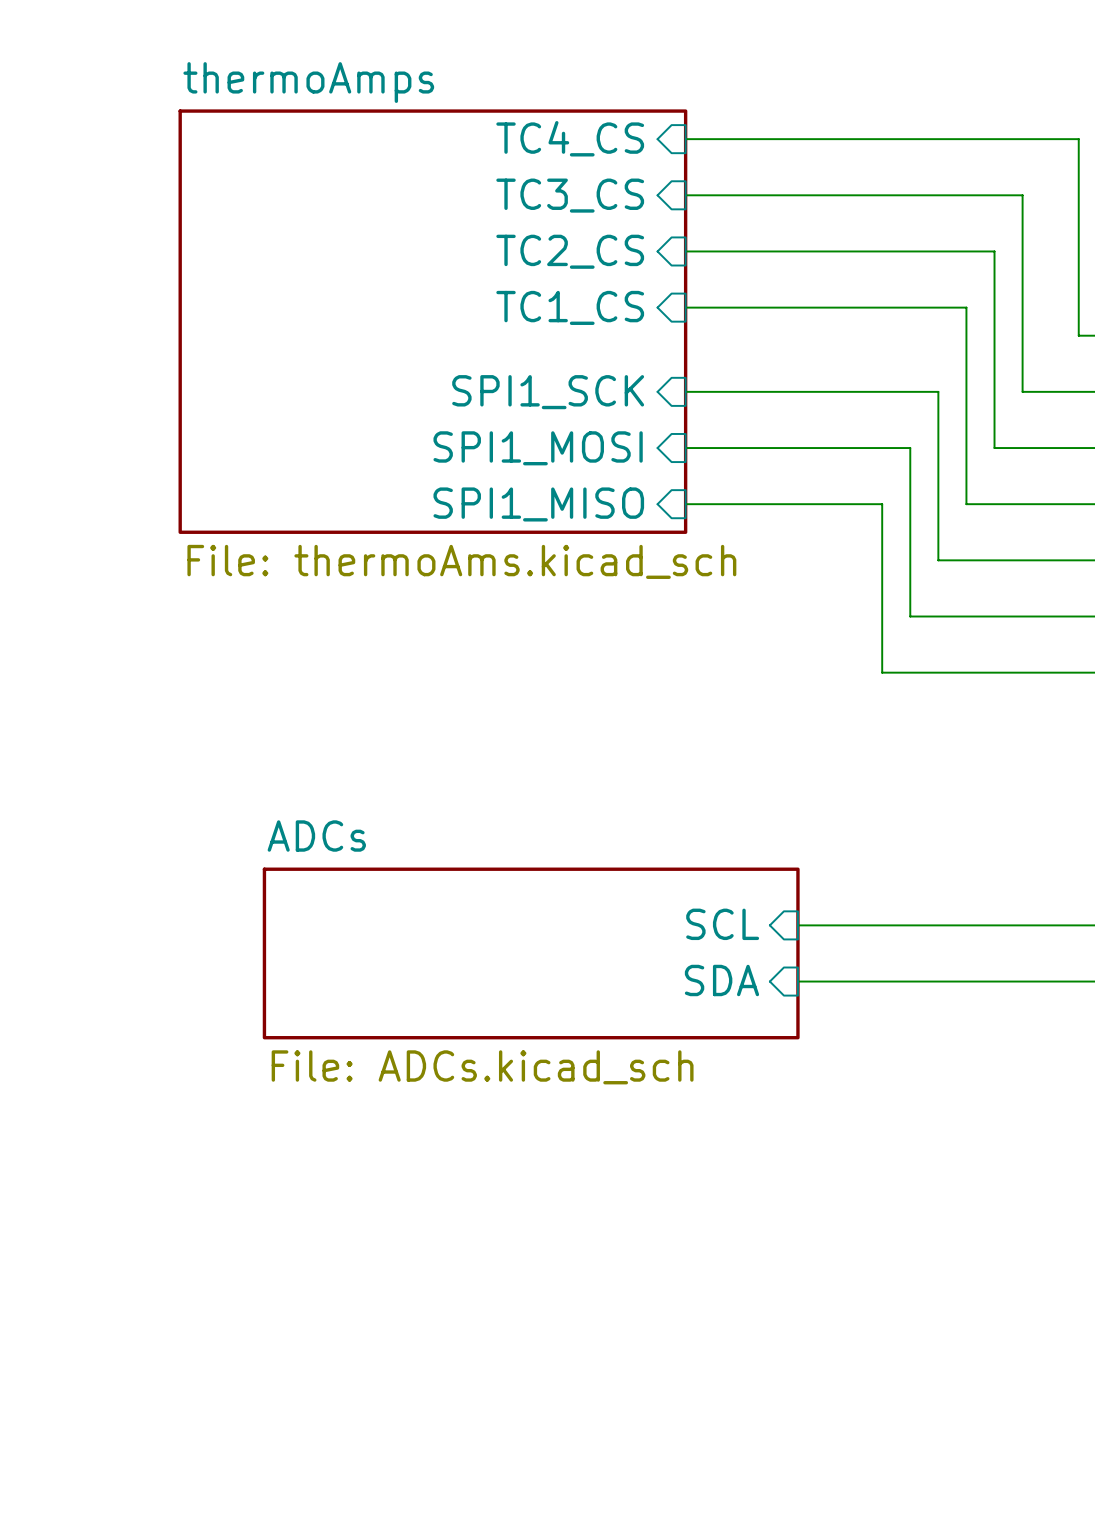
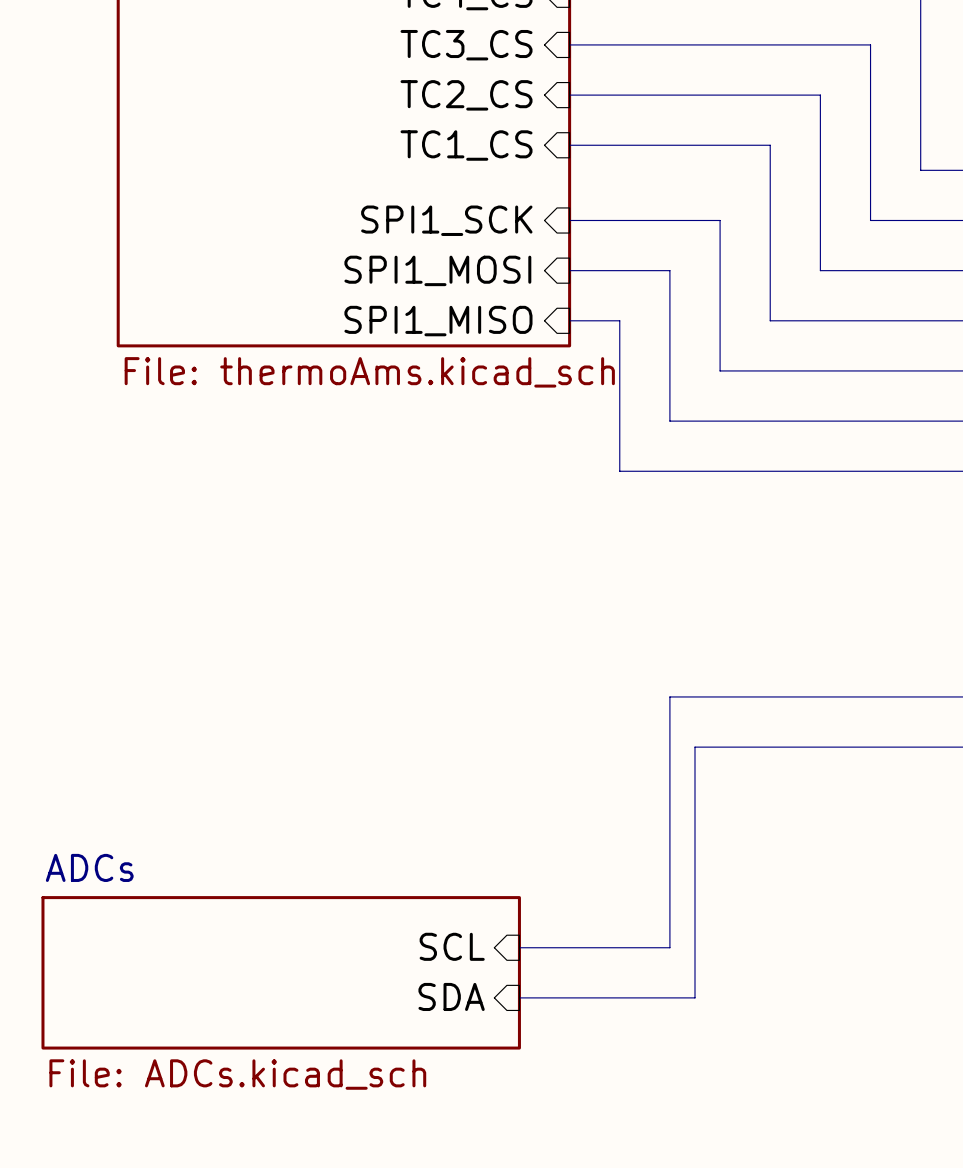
wire: (966, 251) (994, 251) (994, 448) -> none
wire: (910, 307) (966, 307) -> (820, 95) (820, 145)
wire: (854, 391) (938, 391) (938, 560) -> (720, 220) (720, 370) (795, 370)
wire: (797, 448) (910, 448) -> (770, 145) (770, 270)
wire: (966, 448) (966, 504) -> (820, 270) (845, 270)
wire: (741, 504) (882, 504) (882, 672) -> (619, 320) (619, 471) (745, 471)
wire: (910, 504) (910, 616) -> (669, 270) (669, 421) (770, 421)
wire: none -> (770, 320) (820, 320)
sheet pin position: SCL (722, 924) -> SCL (452, 946)
wire: none -> (669, 696) (669, 947) (519, 947)
sheet ADCs position: (531, 953) -> (281, 972)
sheet pin position: SDA (721, 980) -> SDA (451, 996)
wire: (797, 981) (826, 981) -> (519, 997) (694, 997) (694, 747)

